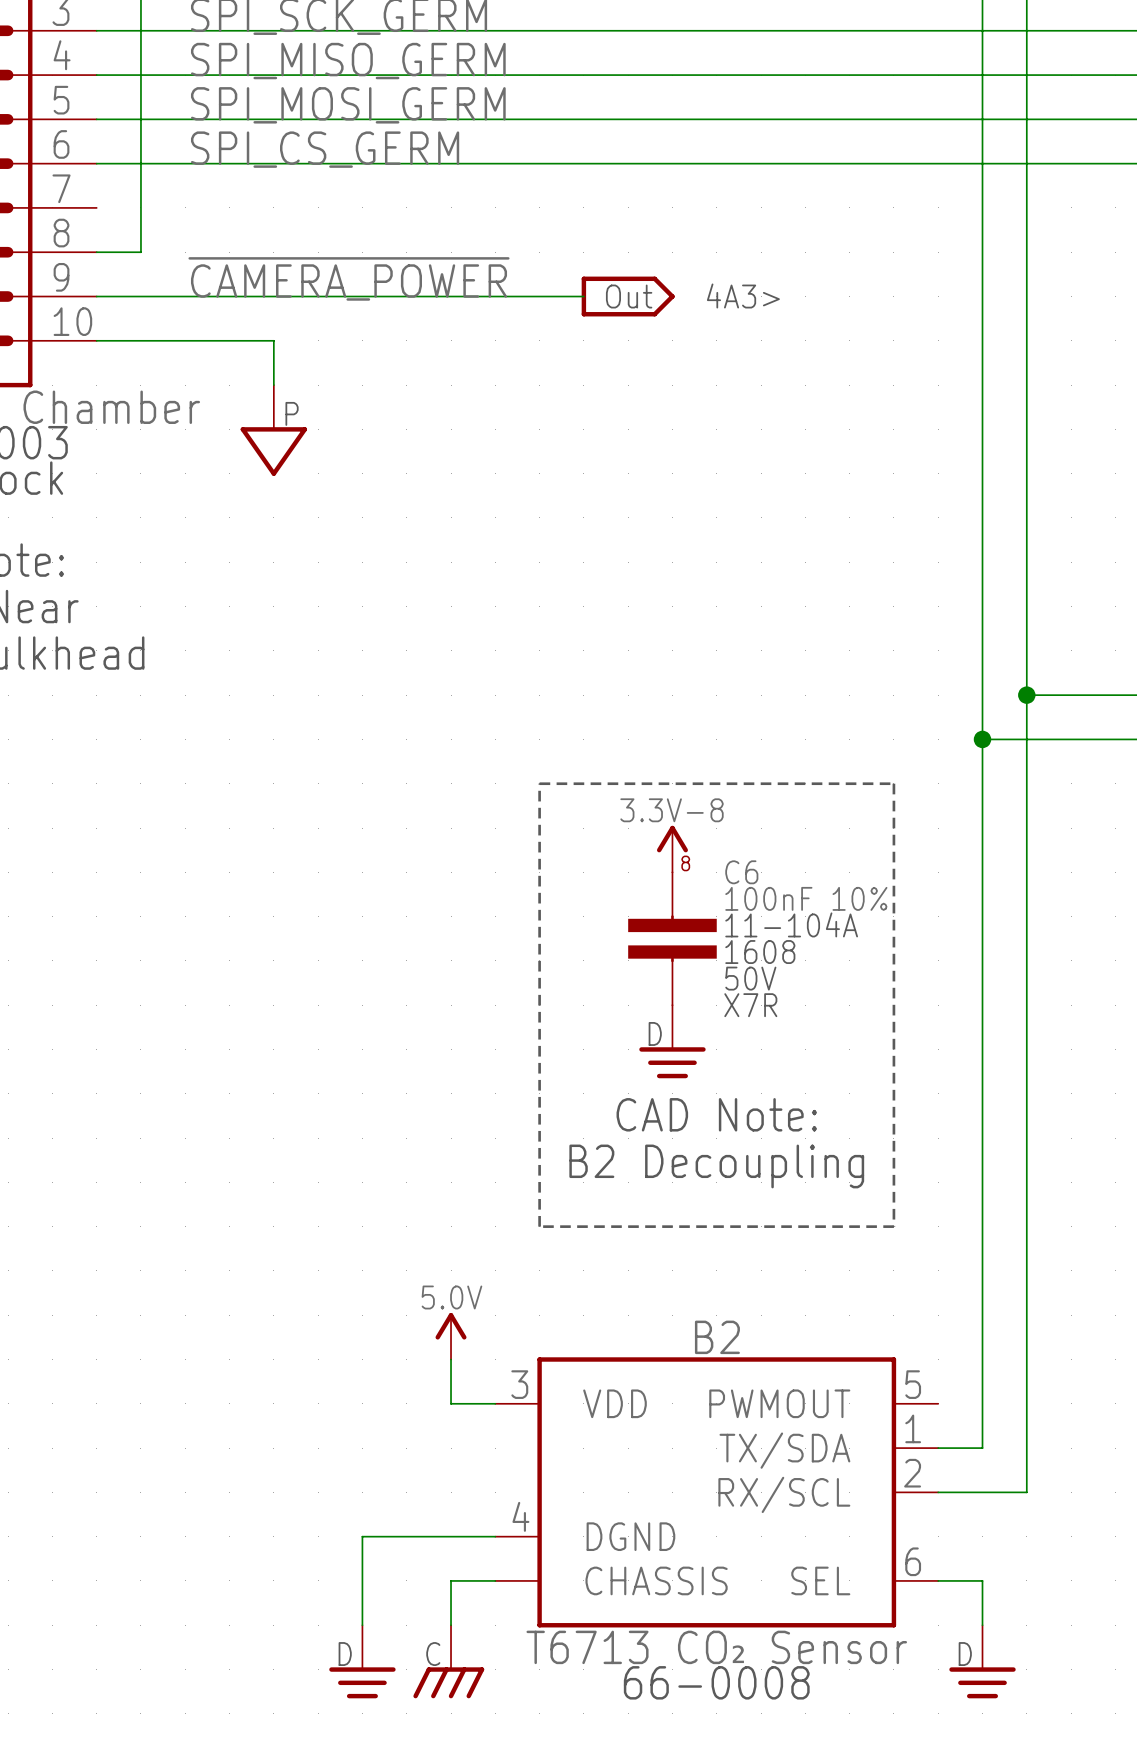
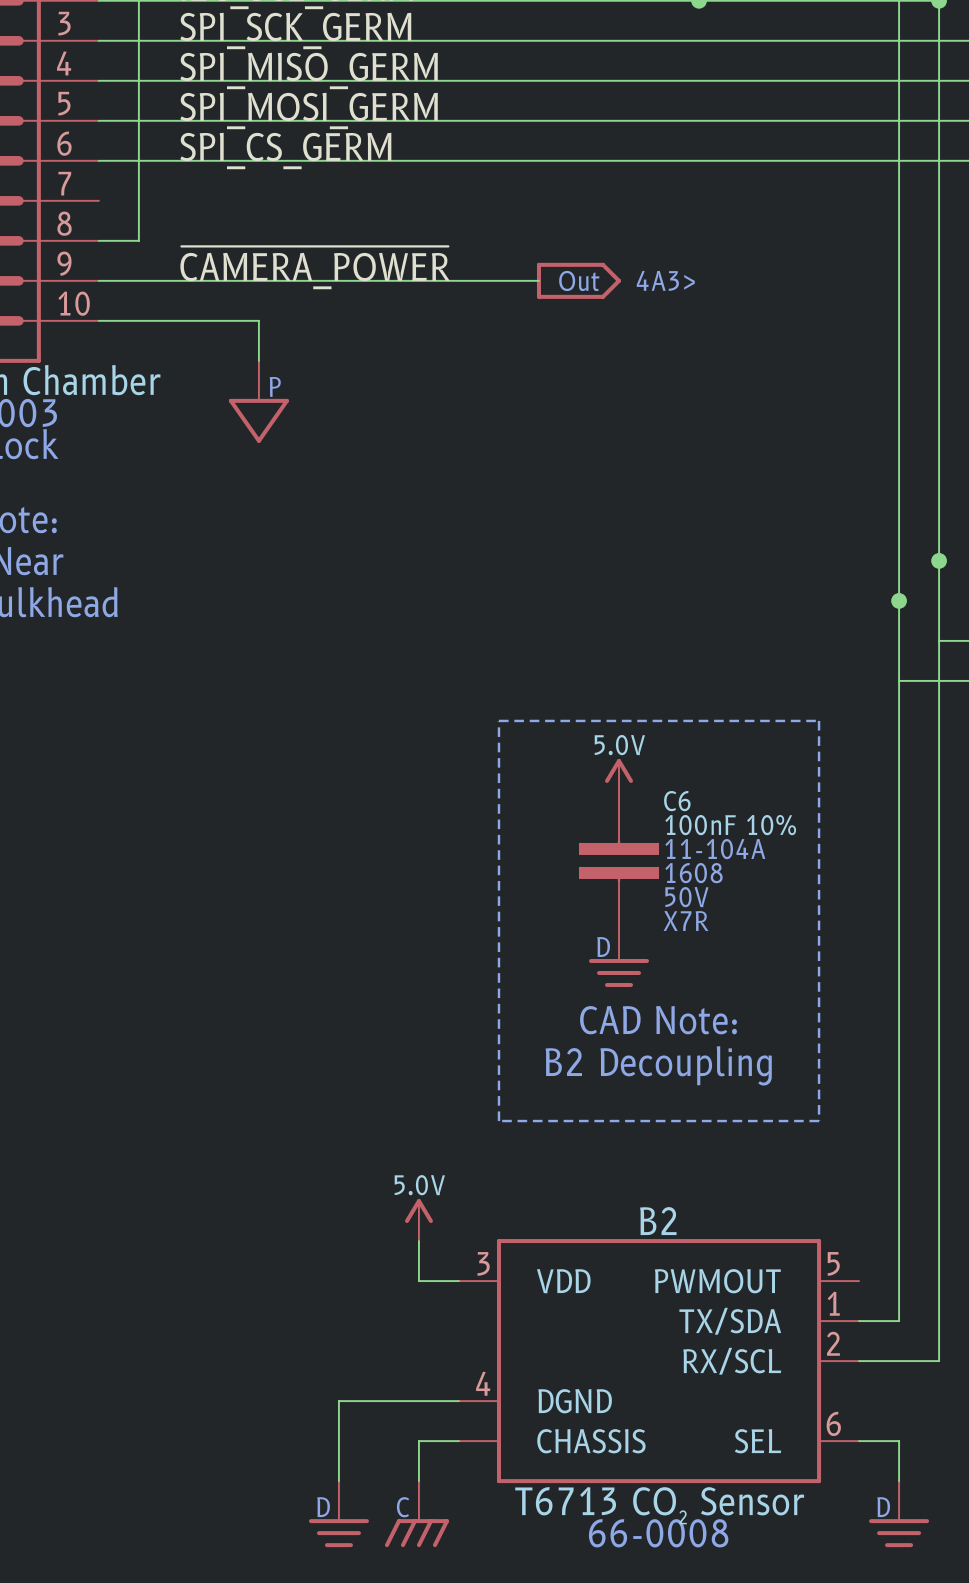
junction: none -> (939, 560)
junction: none -> (899, 600)
junction: (1026, 695) -> none
junction: (982, 739) -> none
power symbol: 3.3V-8 (672, 849) -> 5.0V (619, 779)

